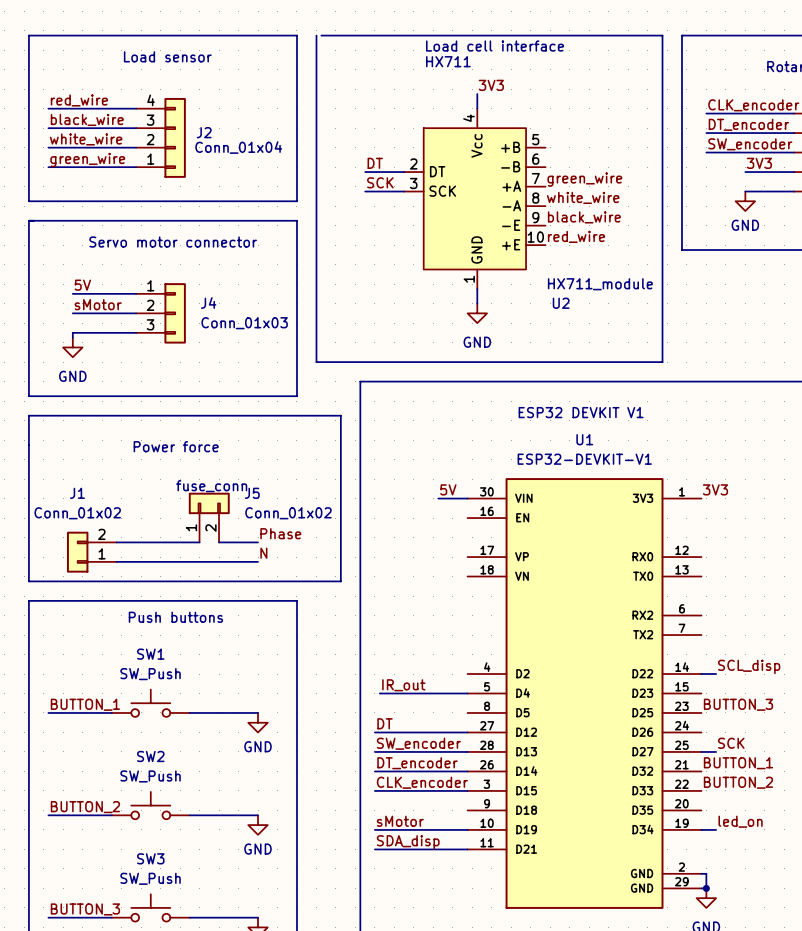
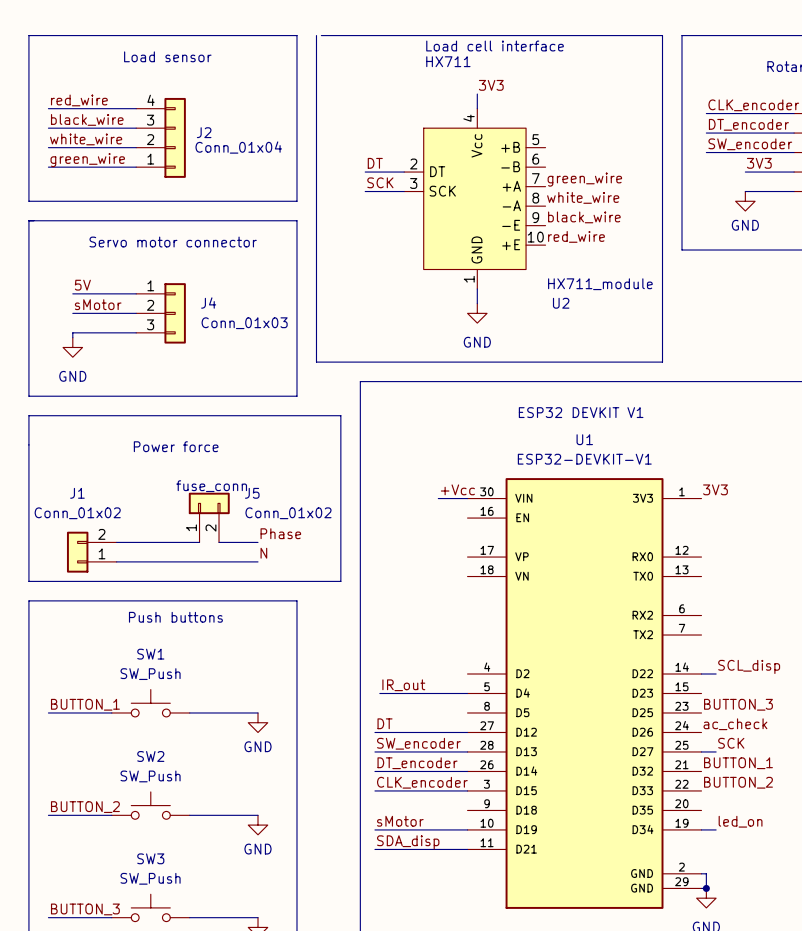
label: 5V (448, 489) -> +Vcc (457, 489)
label: none -> ac_check (735, 724)

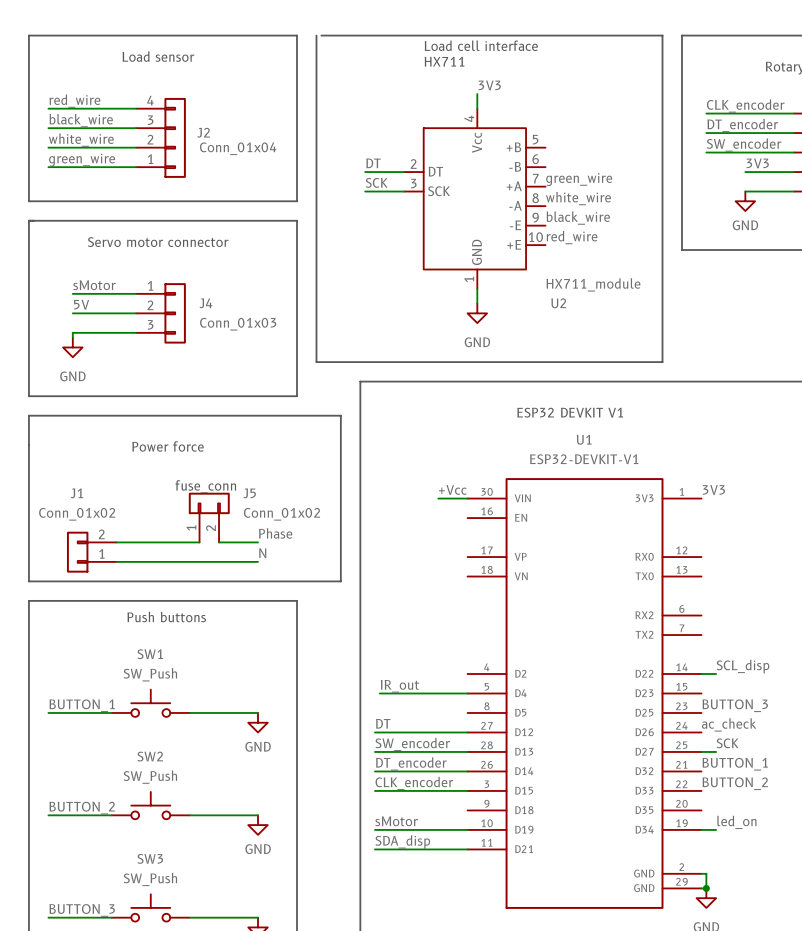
label: 5V (82, 285) -> sMotor (94, 285)
label: sMotor (98, 304) -> 5V (81, 304)

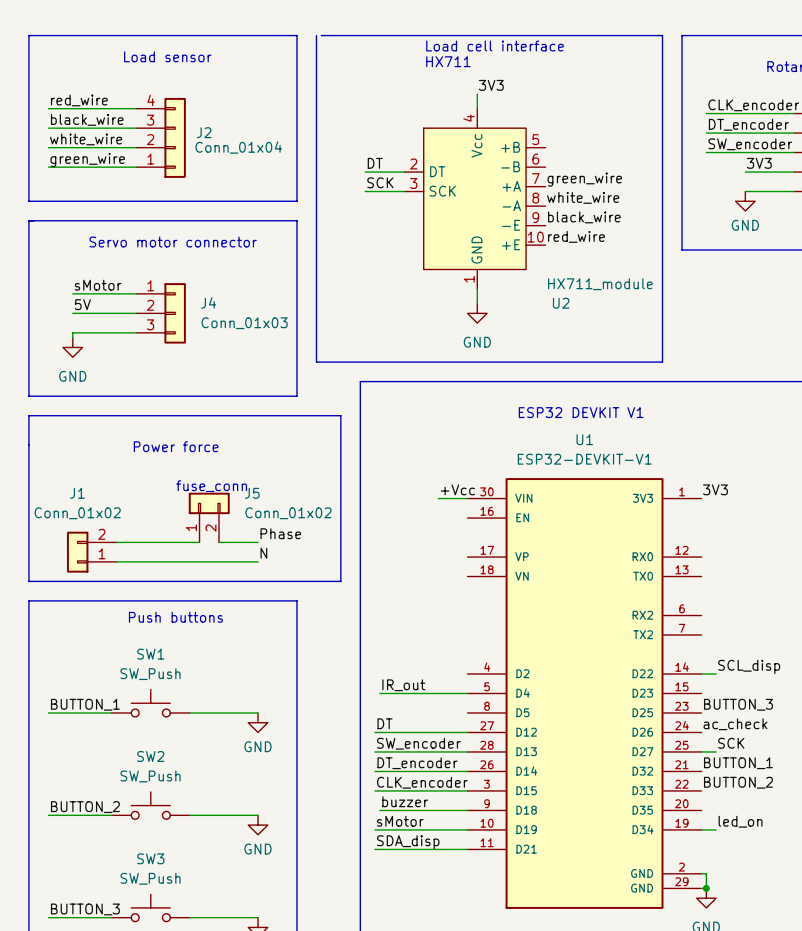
label: none -> buzzer (405, 801)
wire: none -> (379, 810) (467, 810)

